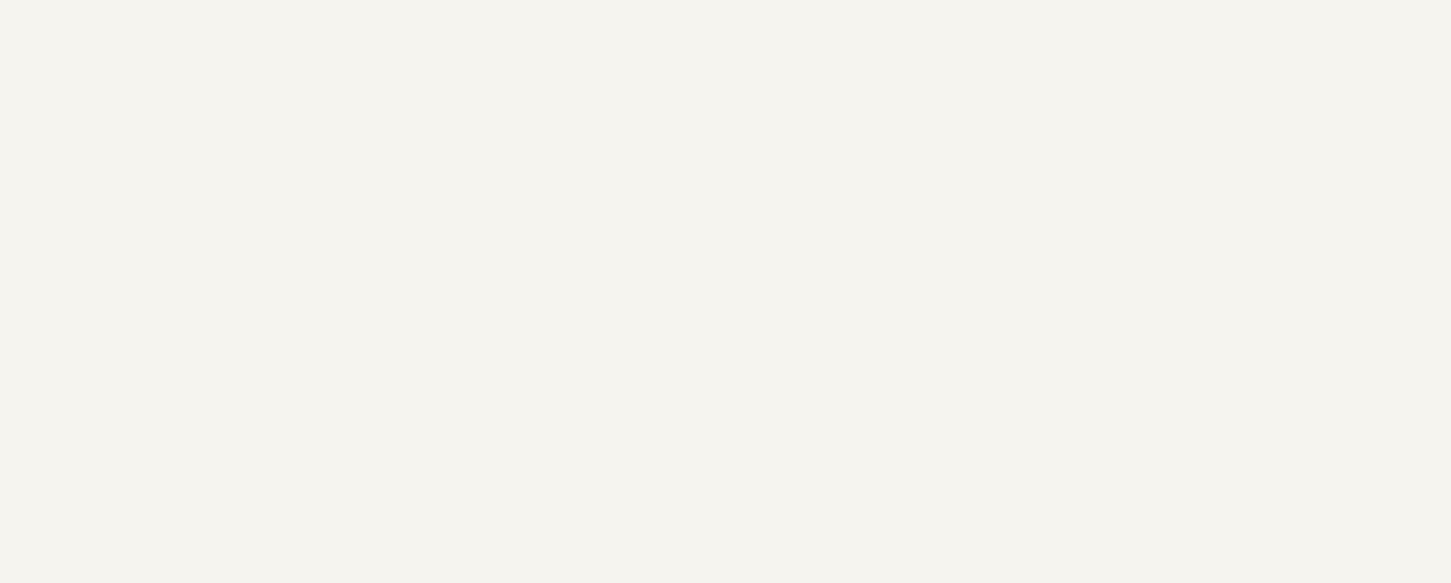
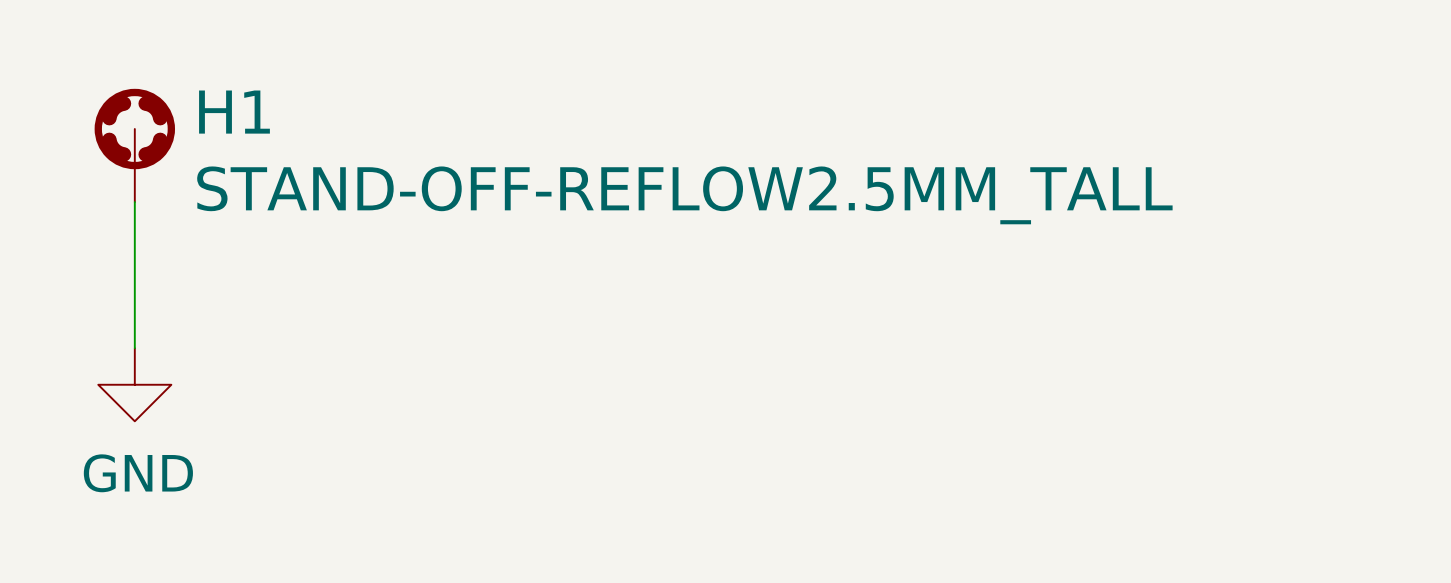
H1: none -> STAND-OFF-REFLOW2.5MM_TALL (134, 145)
wire: none -> (134, 202) (134, 348)
power symbol: none -> GND (134, 384)

